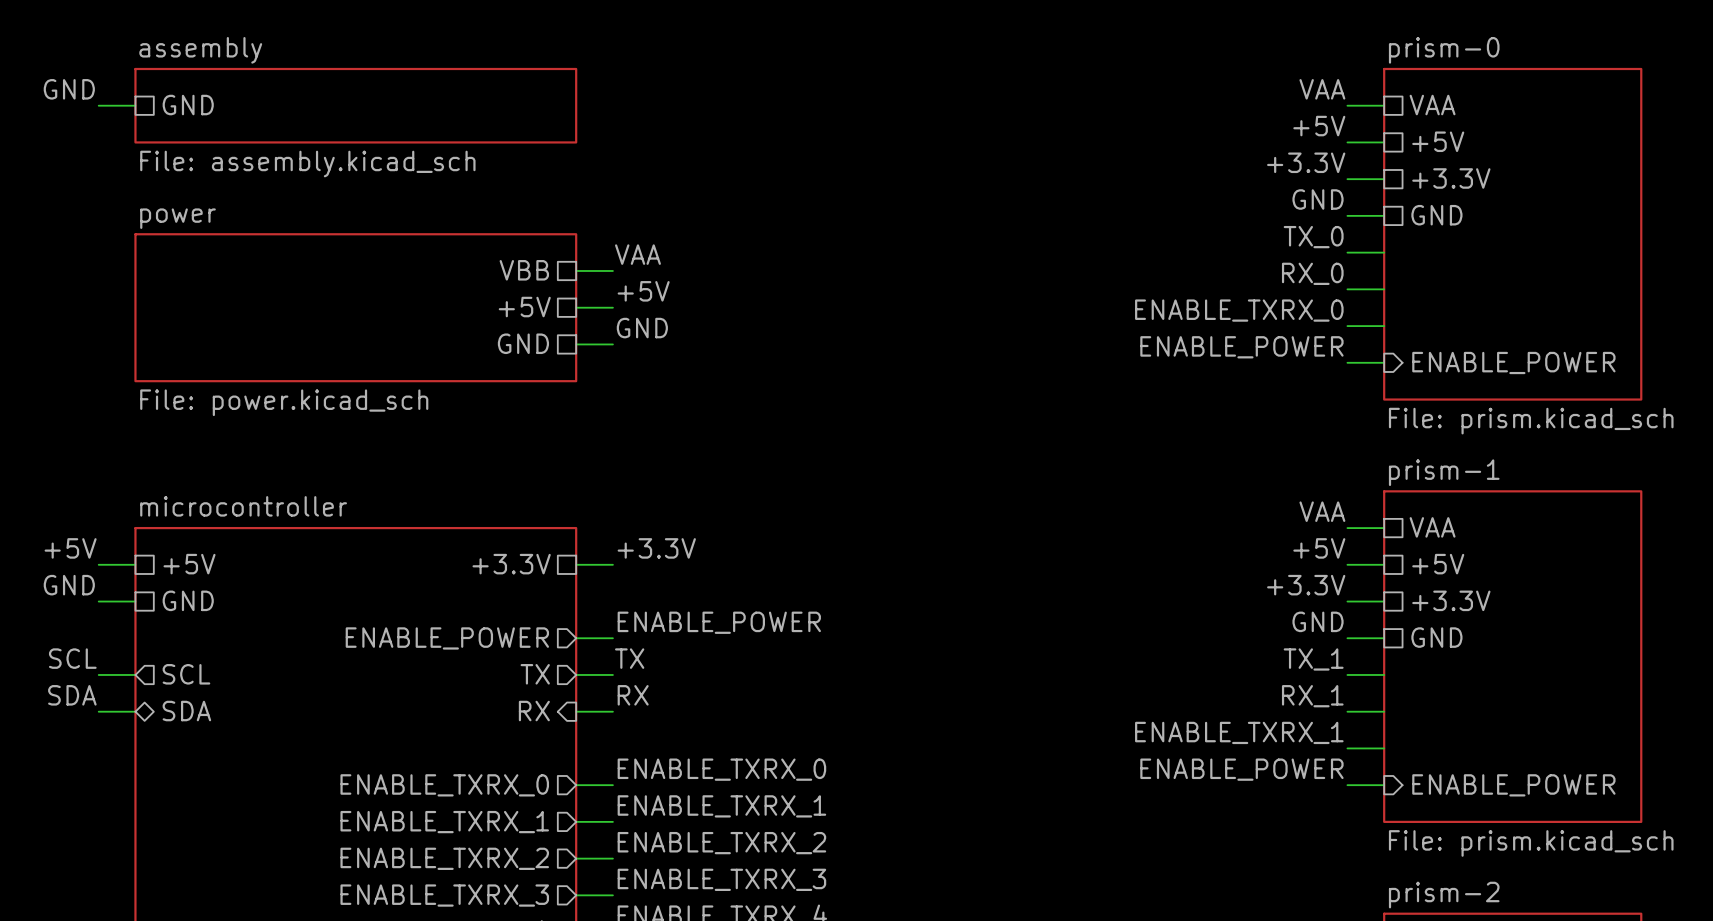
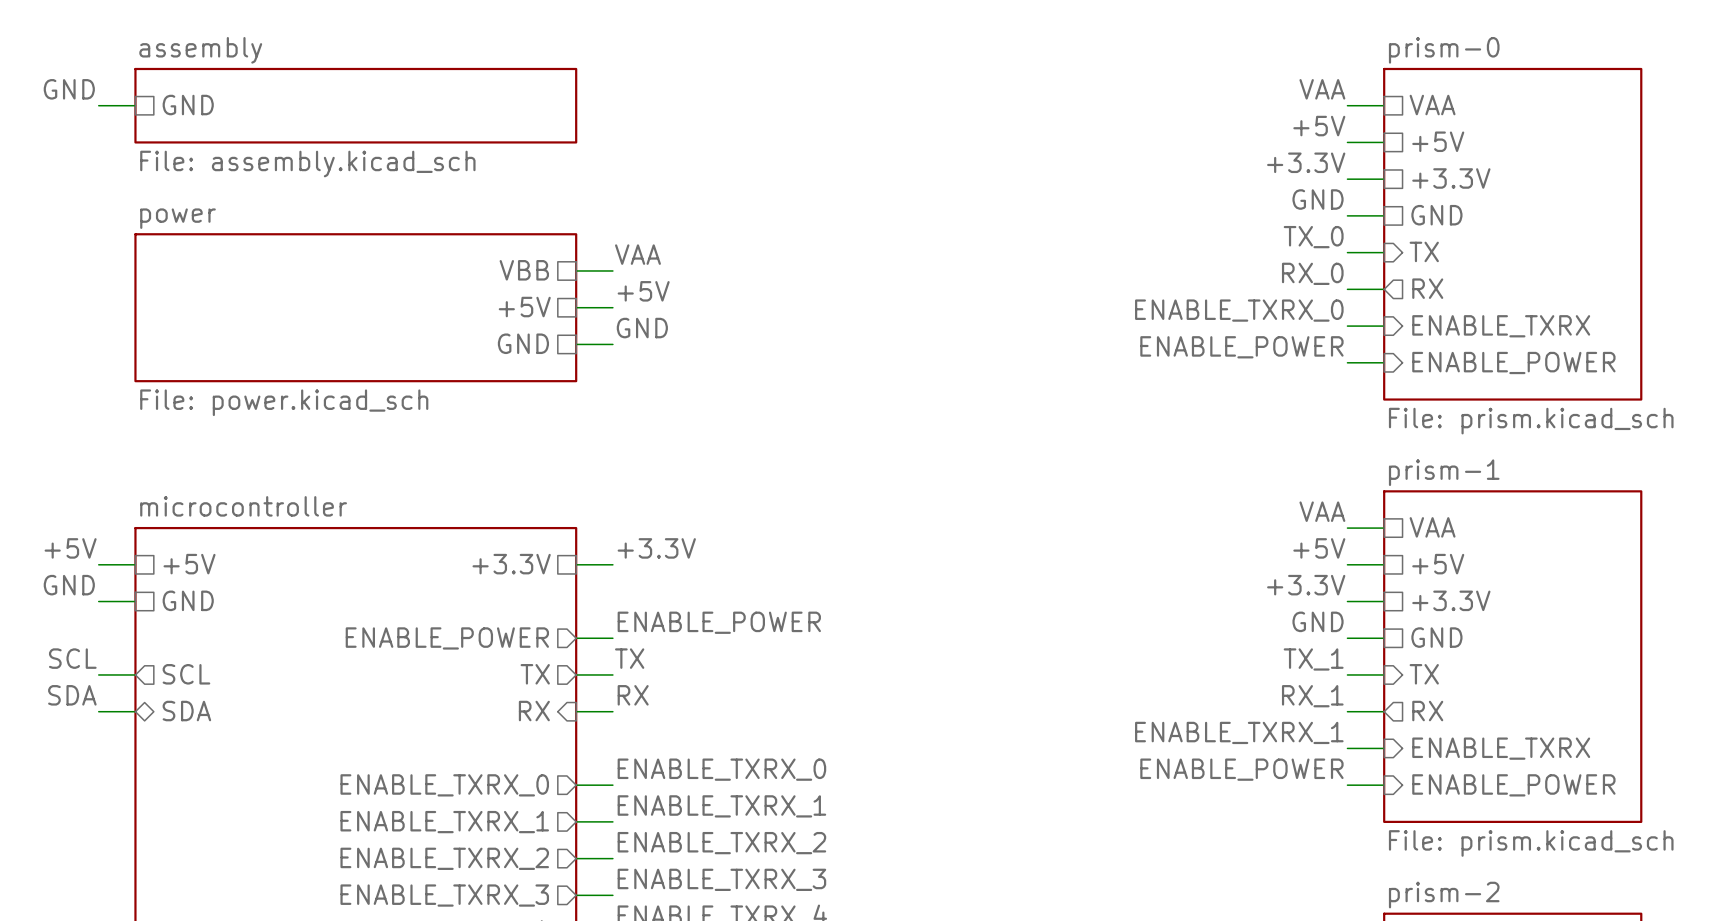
sheet pin: none -> TX (1424, 251)
sheet pin: none -> RX (1427, 288)
sheet pin: none -> ENABLE_TXRX (1501, 326)
sheet pin: none -> TX (1424, 674)
sheet pin: none -> RX (1427, 711)
sheet pin: none -> ENABLE_TXRX (1501, 748)

